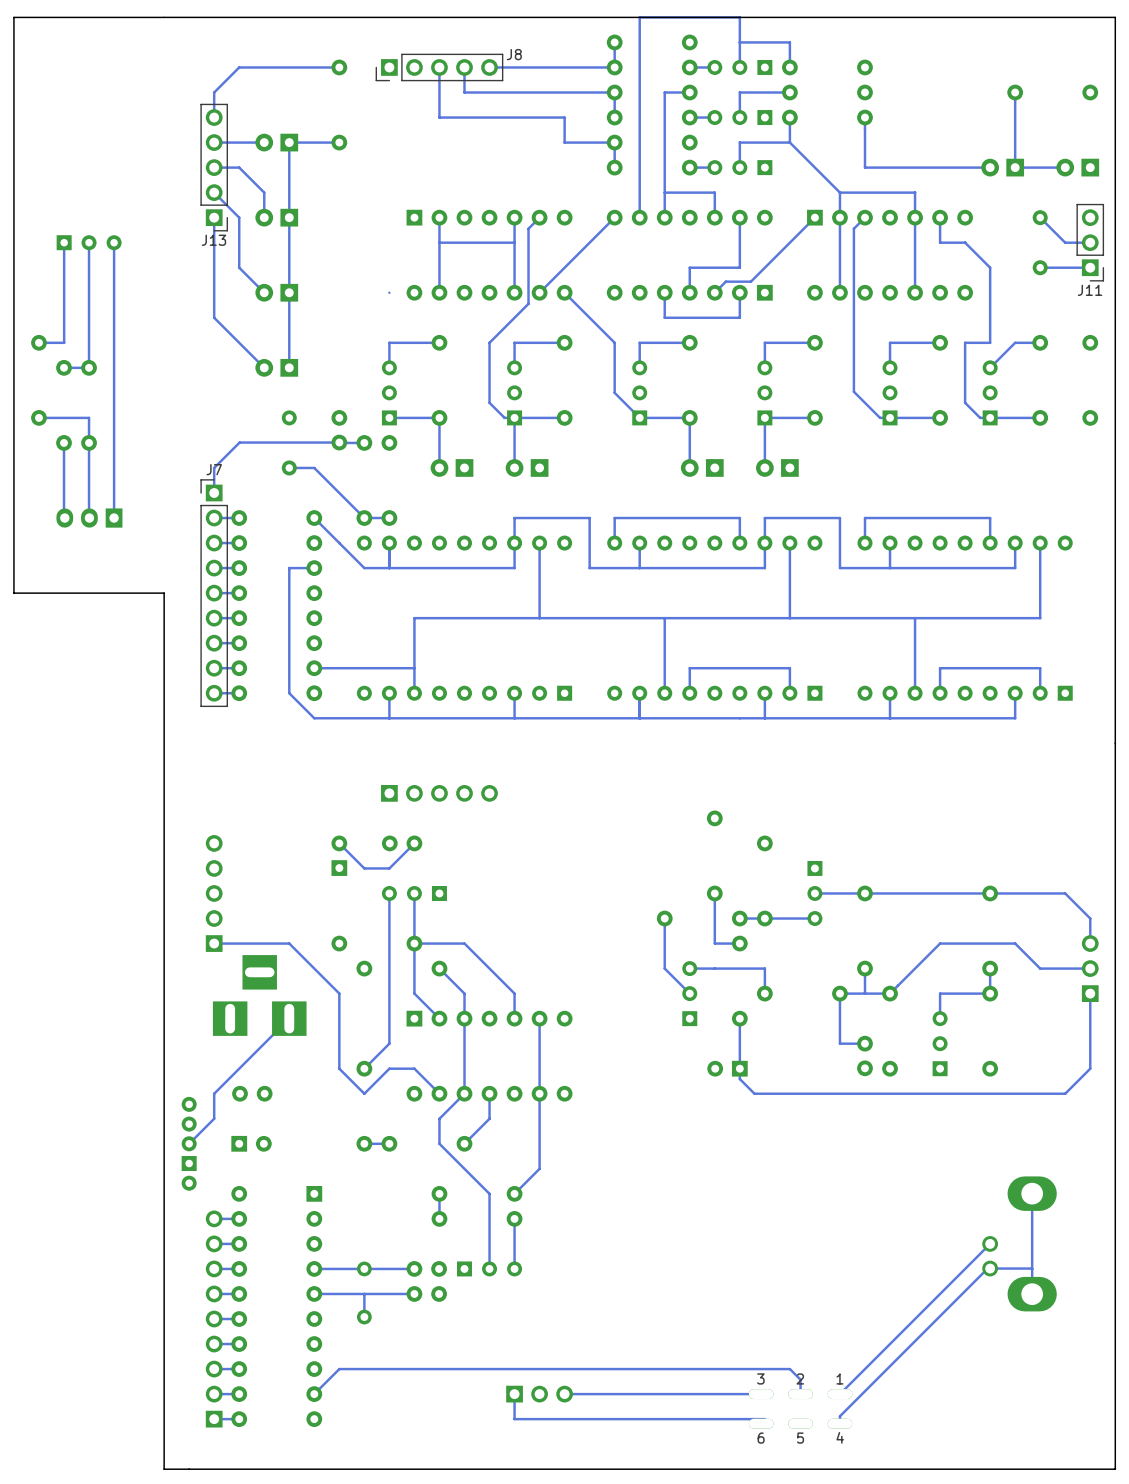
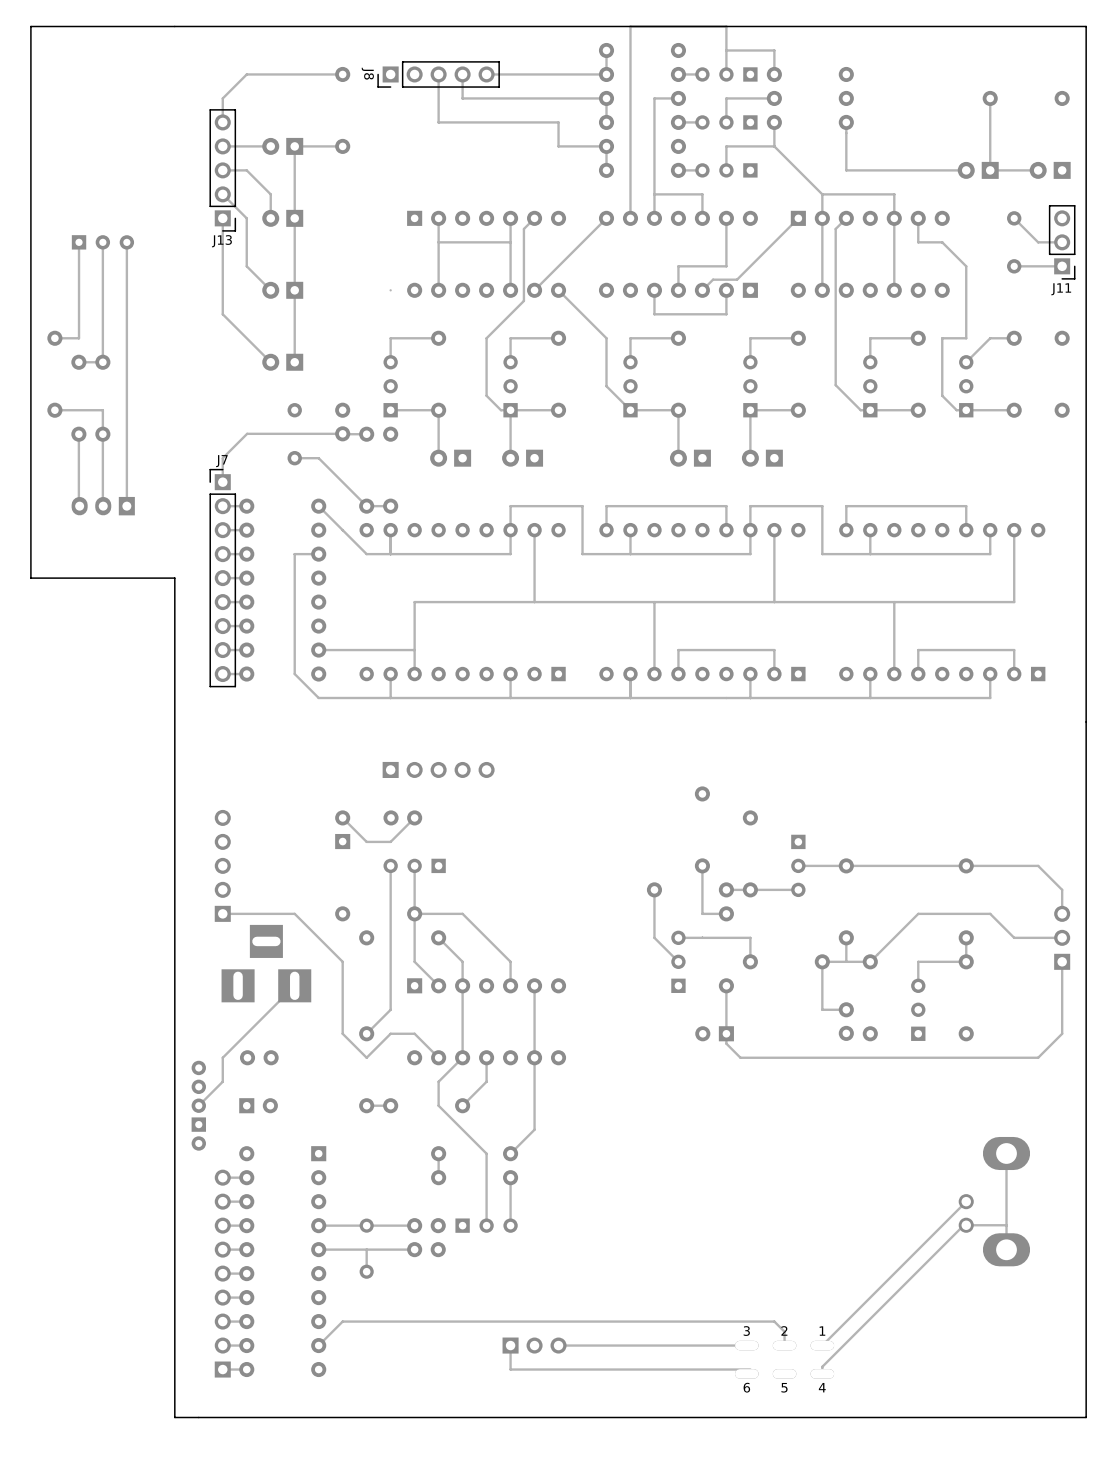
J8 name rotation: 0° (514, 54) -> 90° clockwise (367, 73)
J8 name position: J8 (514, 54) -> J8 (367, 73)

